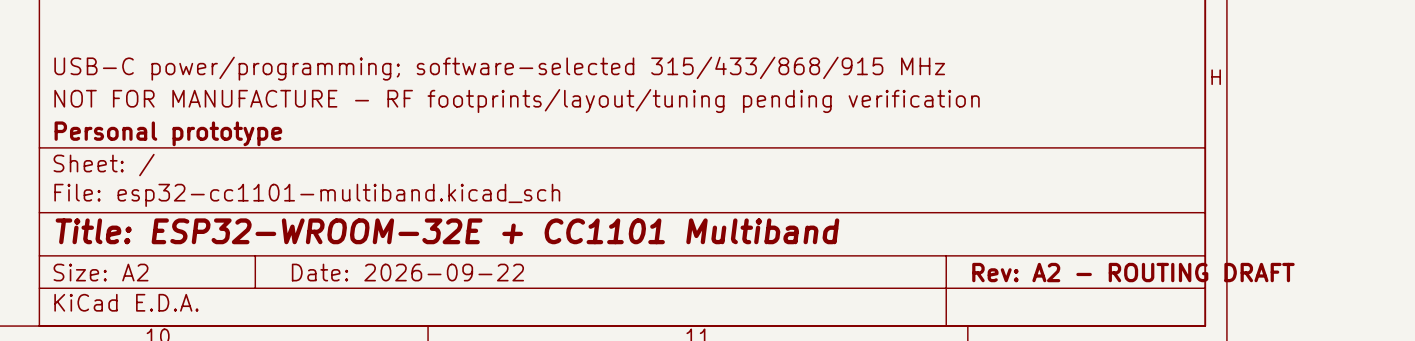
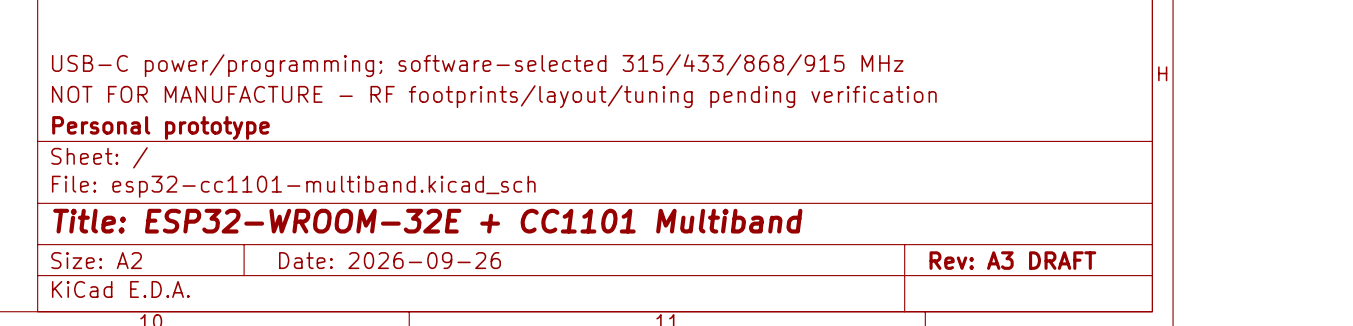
title block: Date: 2026-09-22 (407, 272) -> Date: 2026-09-26 (390, 260)
title block: Rev: A2 - ROUTING DRAFT (1133, 272) -> Rev: A3 DRAFT (1012, 260)

